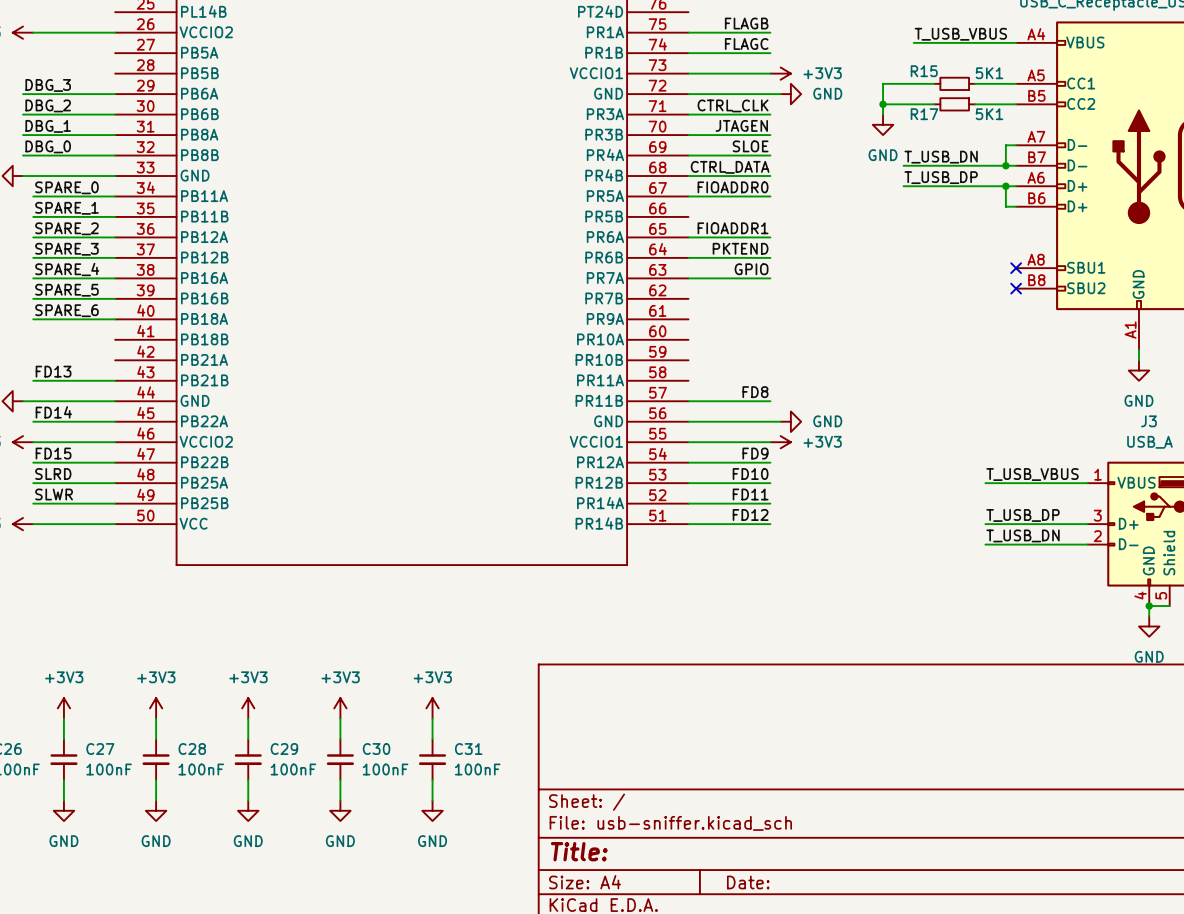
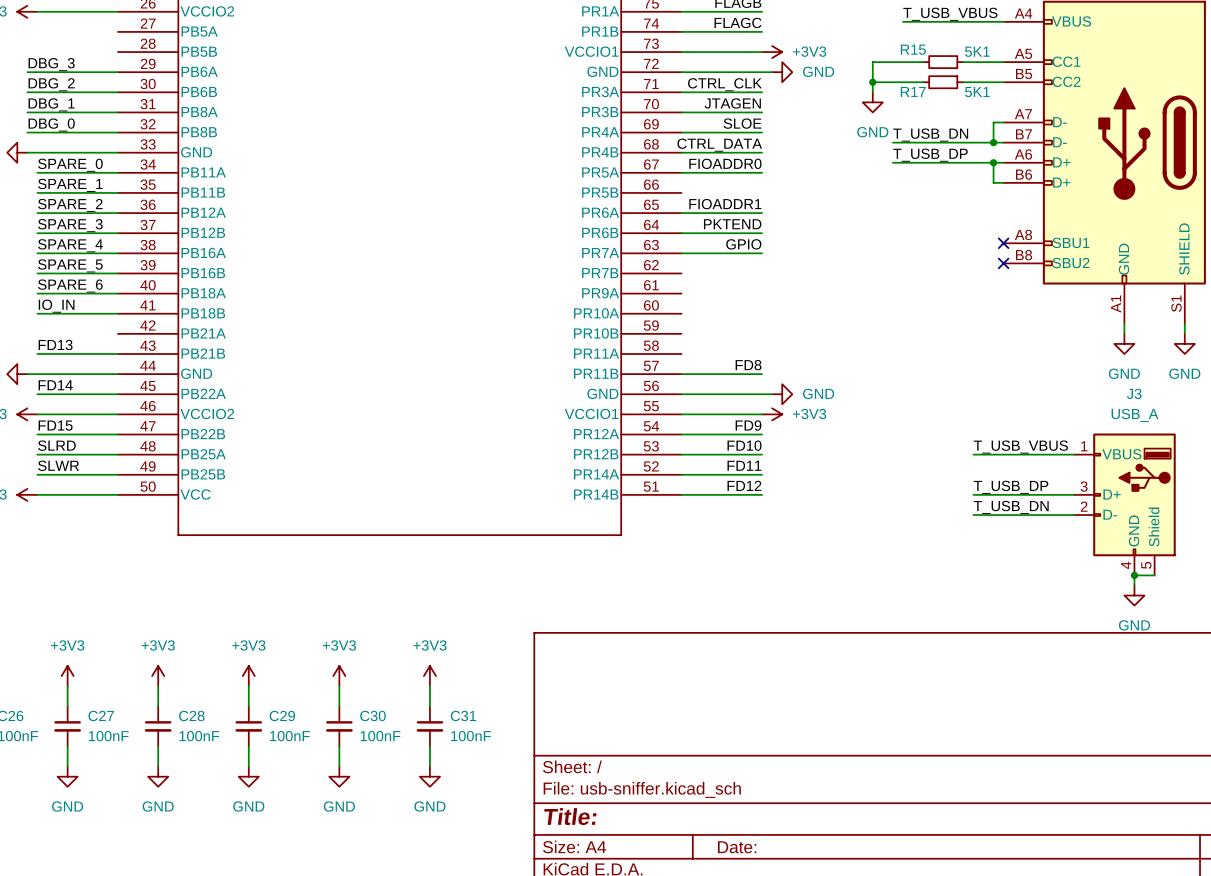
label: none -> IO_IN (56, 306)
wire: none -> (37, 313) (117, 313)

